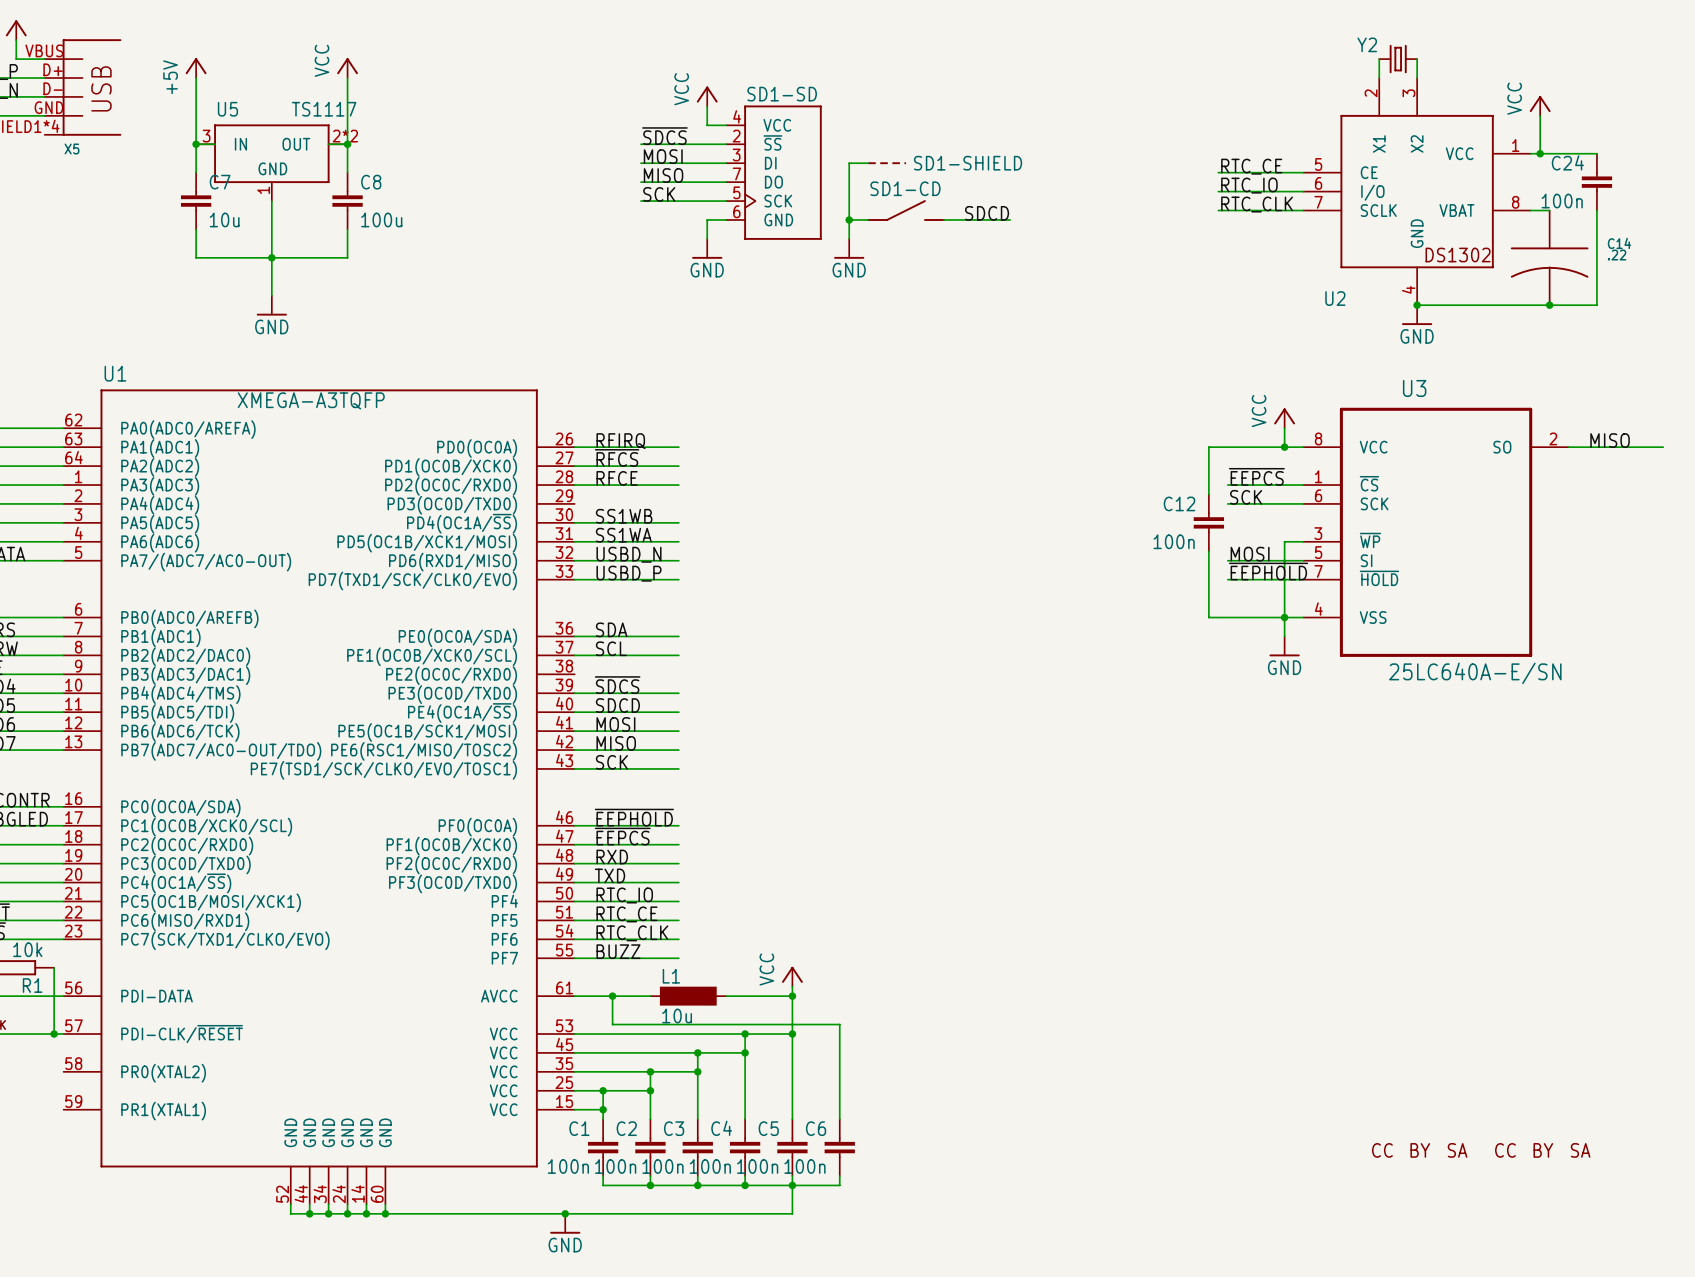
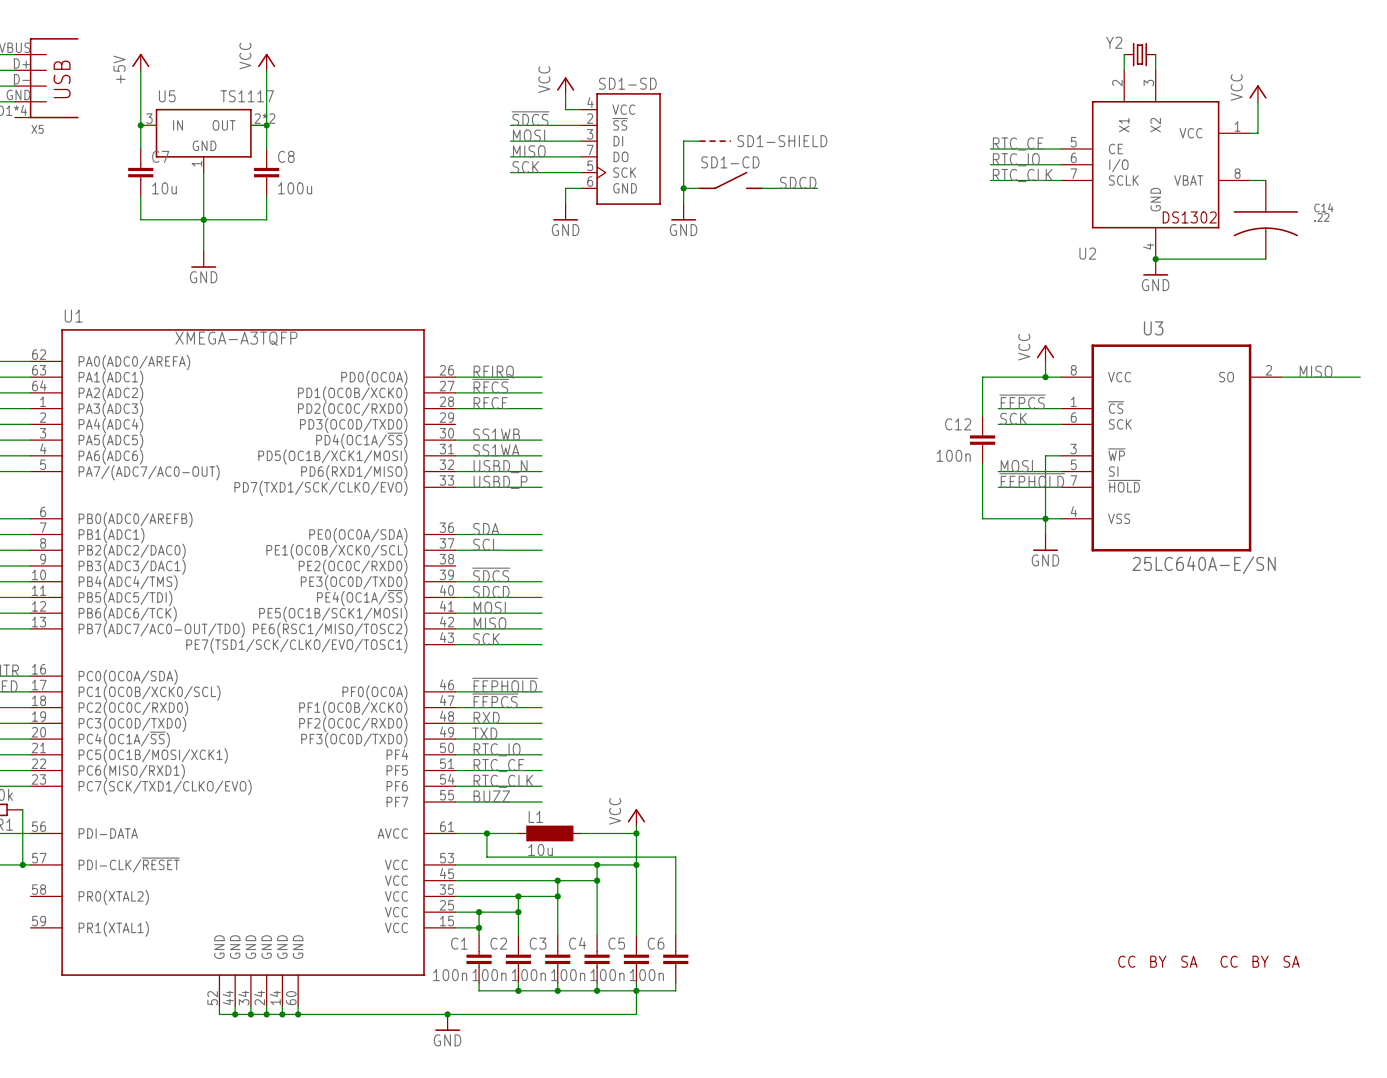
wire: (1540, 153) (1596, 153) -> none
junction: (1540, 153) -> none
C24: 100n (1596, 182) -> none
wire: (1596, 210) (1596, 305) (1549, 305) -> none
junction: (1549, 305) -> none

